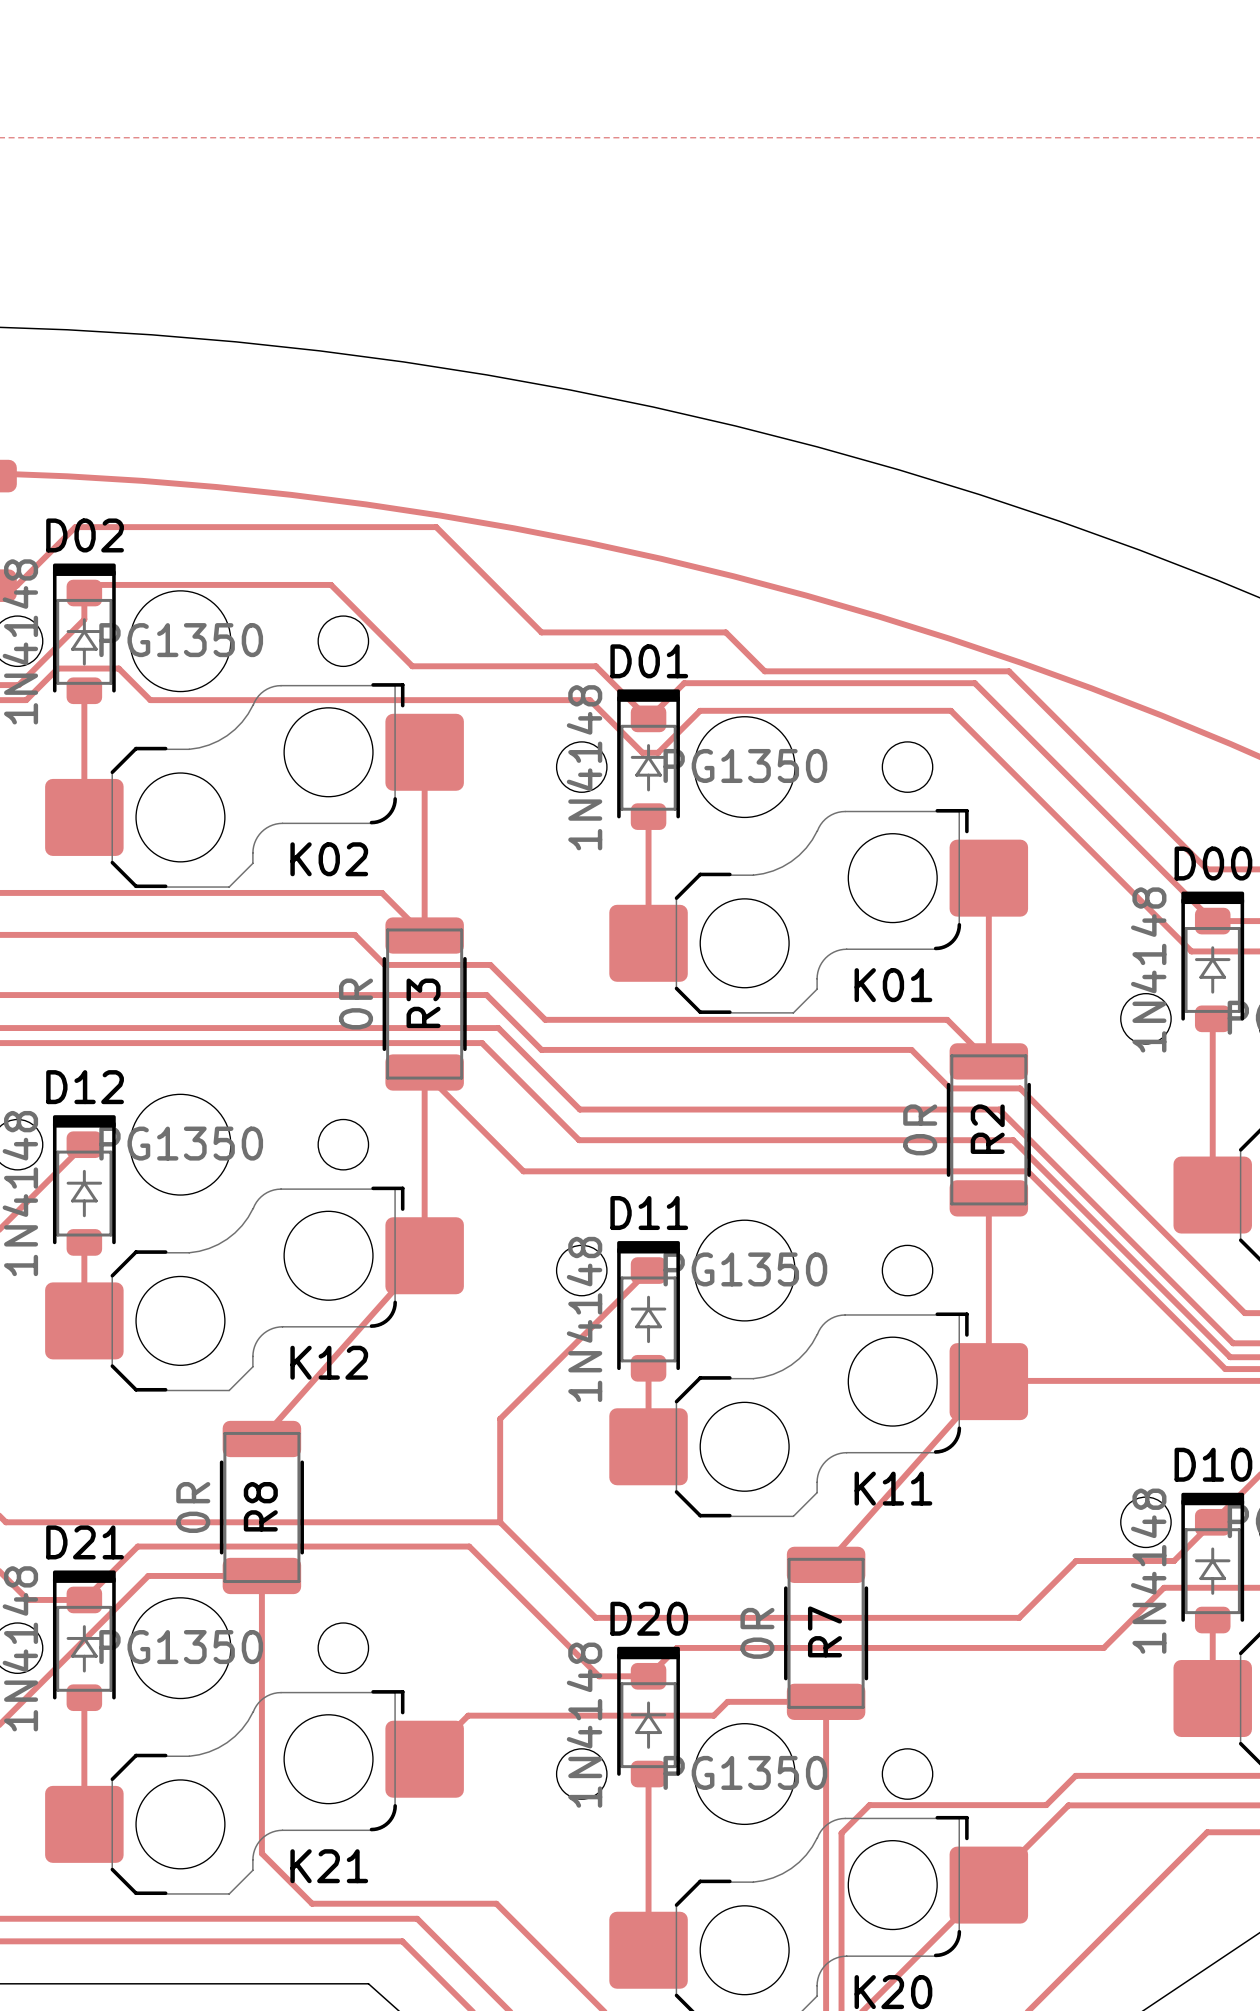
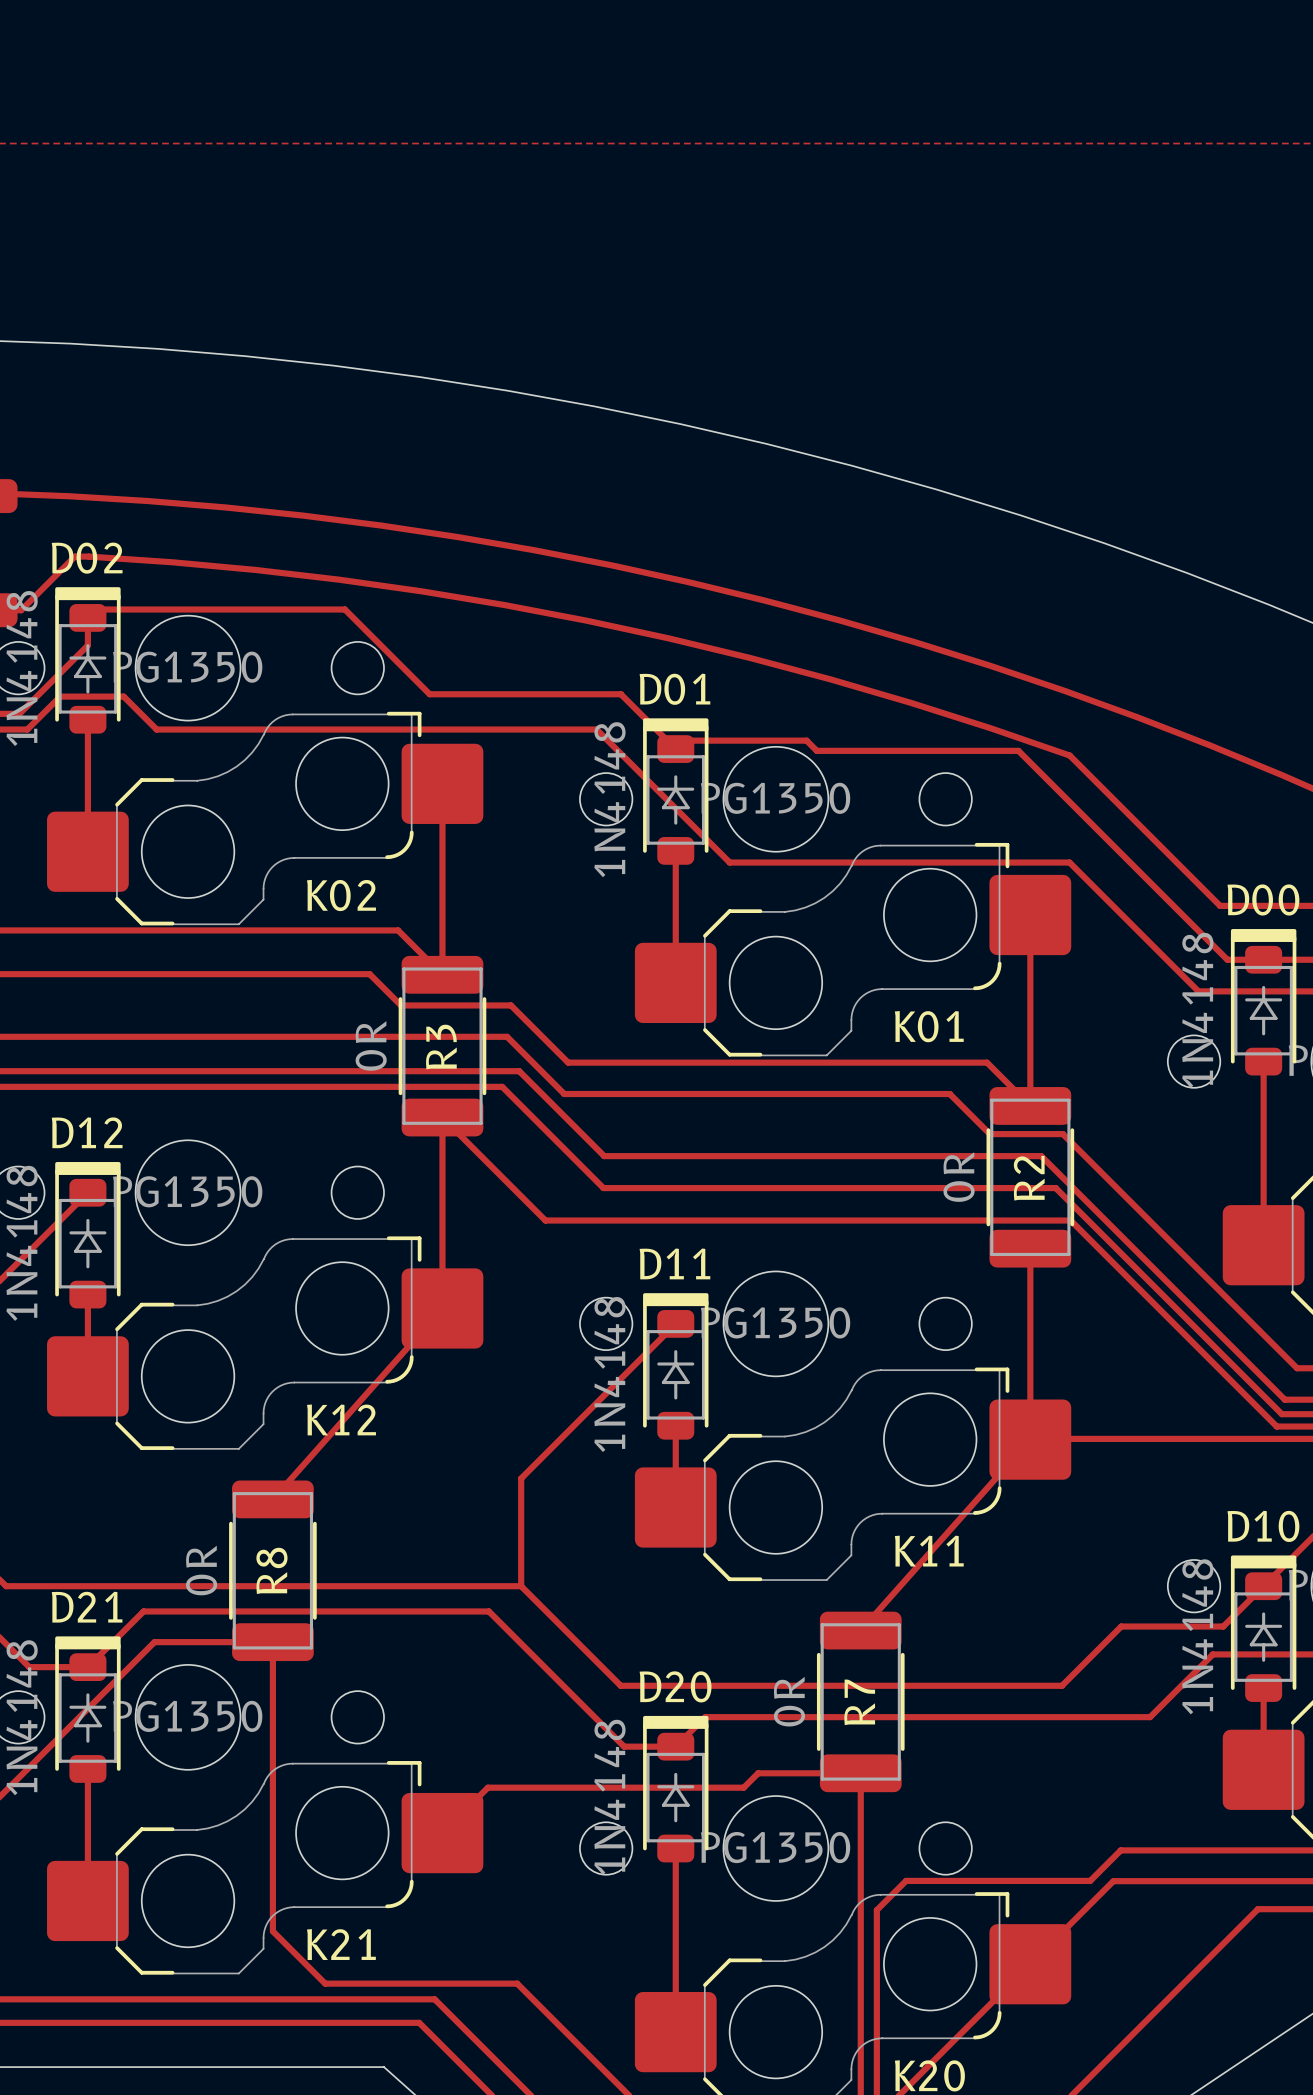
top track: (16, 585) (75, 527) (436, 527) (541, 632) (725, 632) (764, 671) (1009, 671) (1207, 869) -> (17, 610) (21, 610) (74, 556) (88, 556) (172, 562) (338, 579) (504, 605) (668, 638) (830, 679) (990, 728) (1069, 755) (1220, 905) (1257, 905)
top track: (572, 700) (589, 700) (642, 752) (658, 752) (700, 710) -> (684, 740) (729, 740)
top track: none -> (596, 729) (729, 862) (1069, 862) (1198, 991) (1241, 991)
top track: (656, 710) (684, 683) (974, 683) (1212, 921) -> none
top track: (774, 710) (950, 710) (1191, 951) -> (806, 740) (816, 750) (1018, 750) (1227, 959) (1263, 959)

